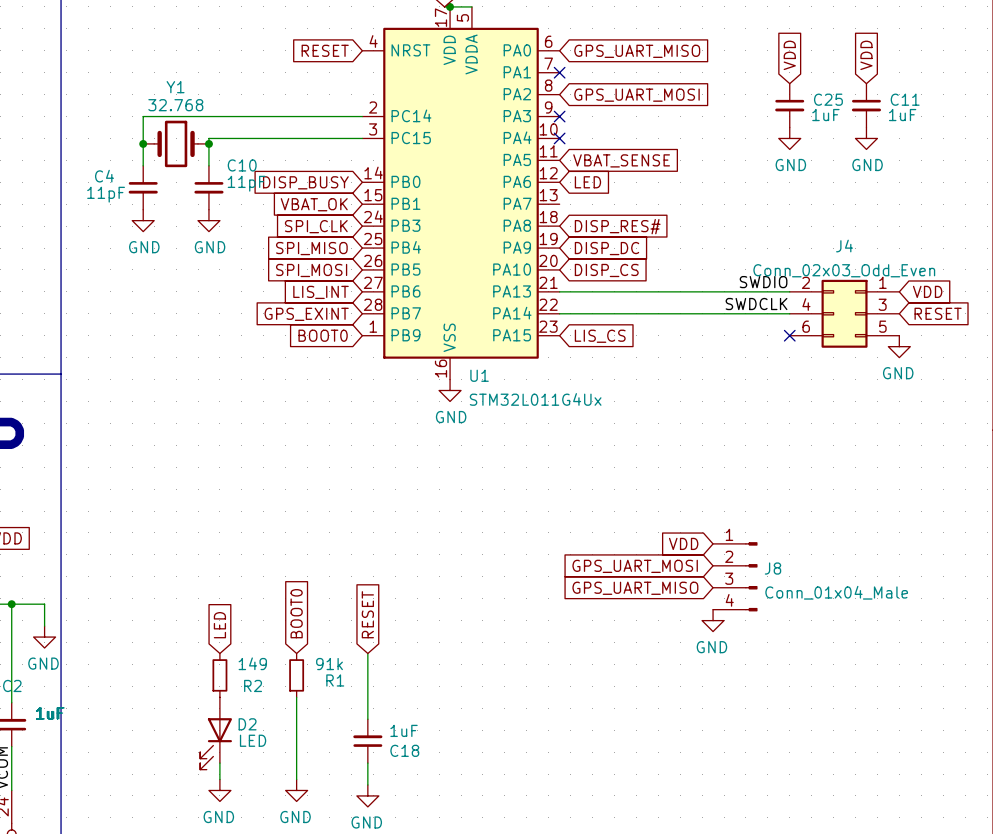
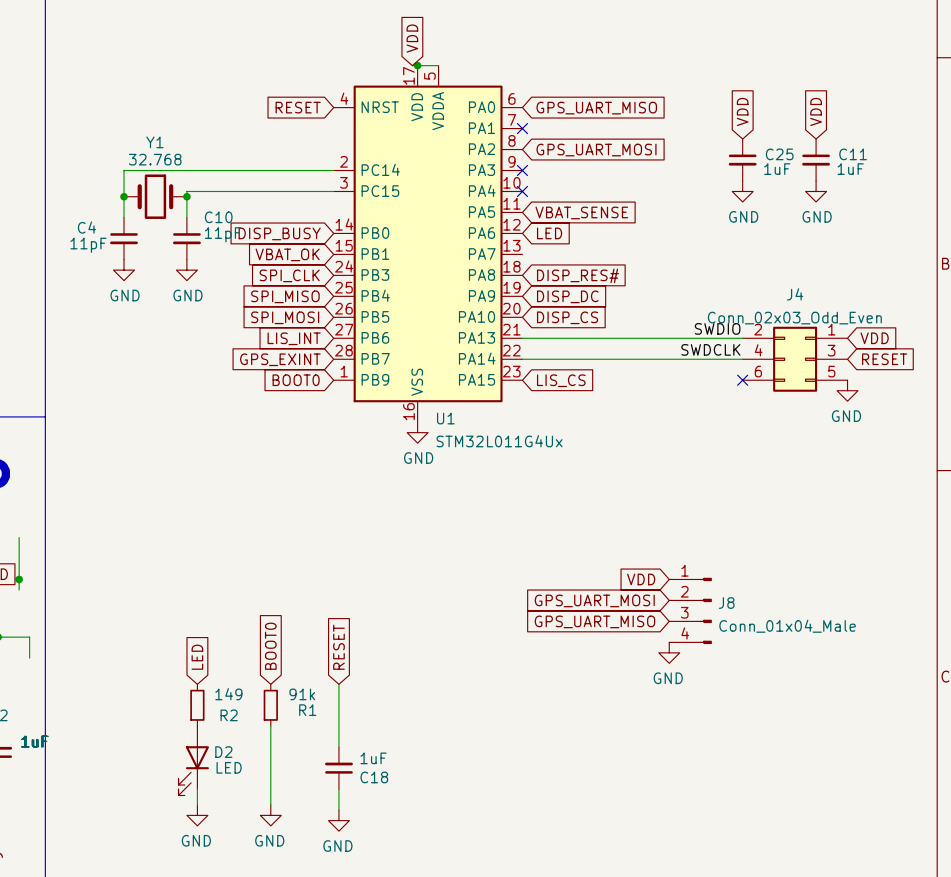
wire: none -> (19, 537) (19, 589)
junction: none -> (19, 579)
power symbol: GND (44, 637) -> none

